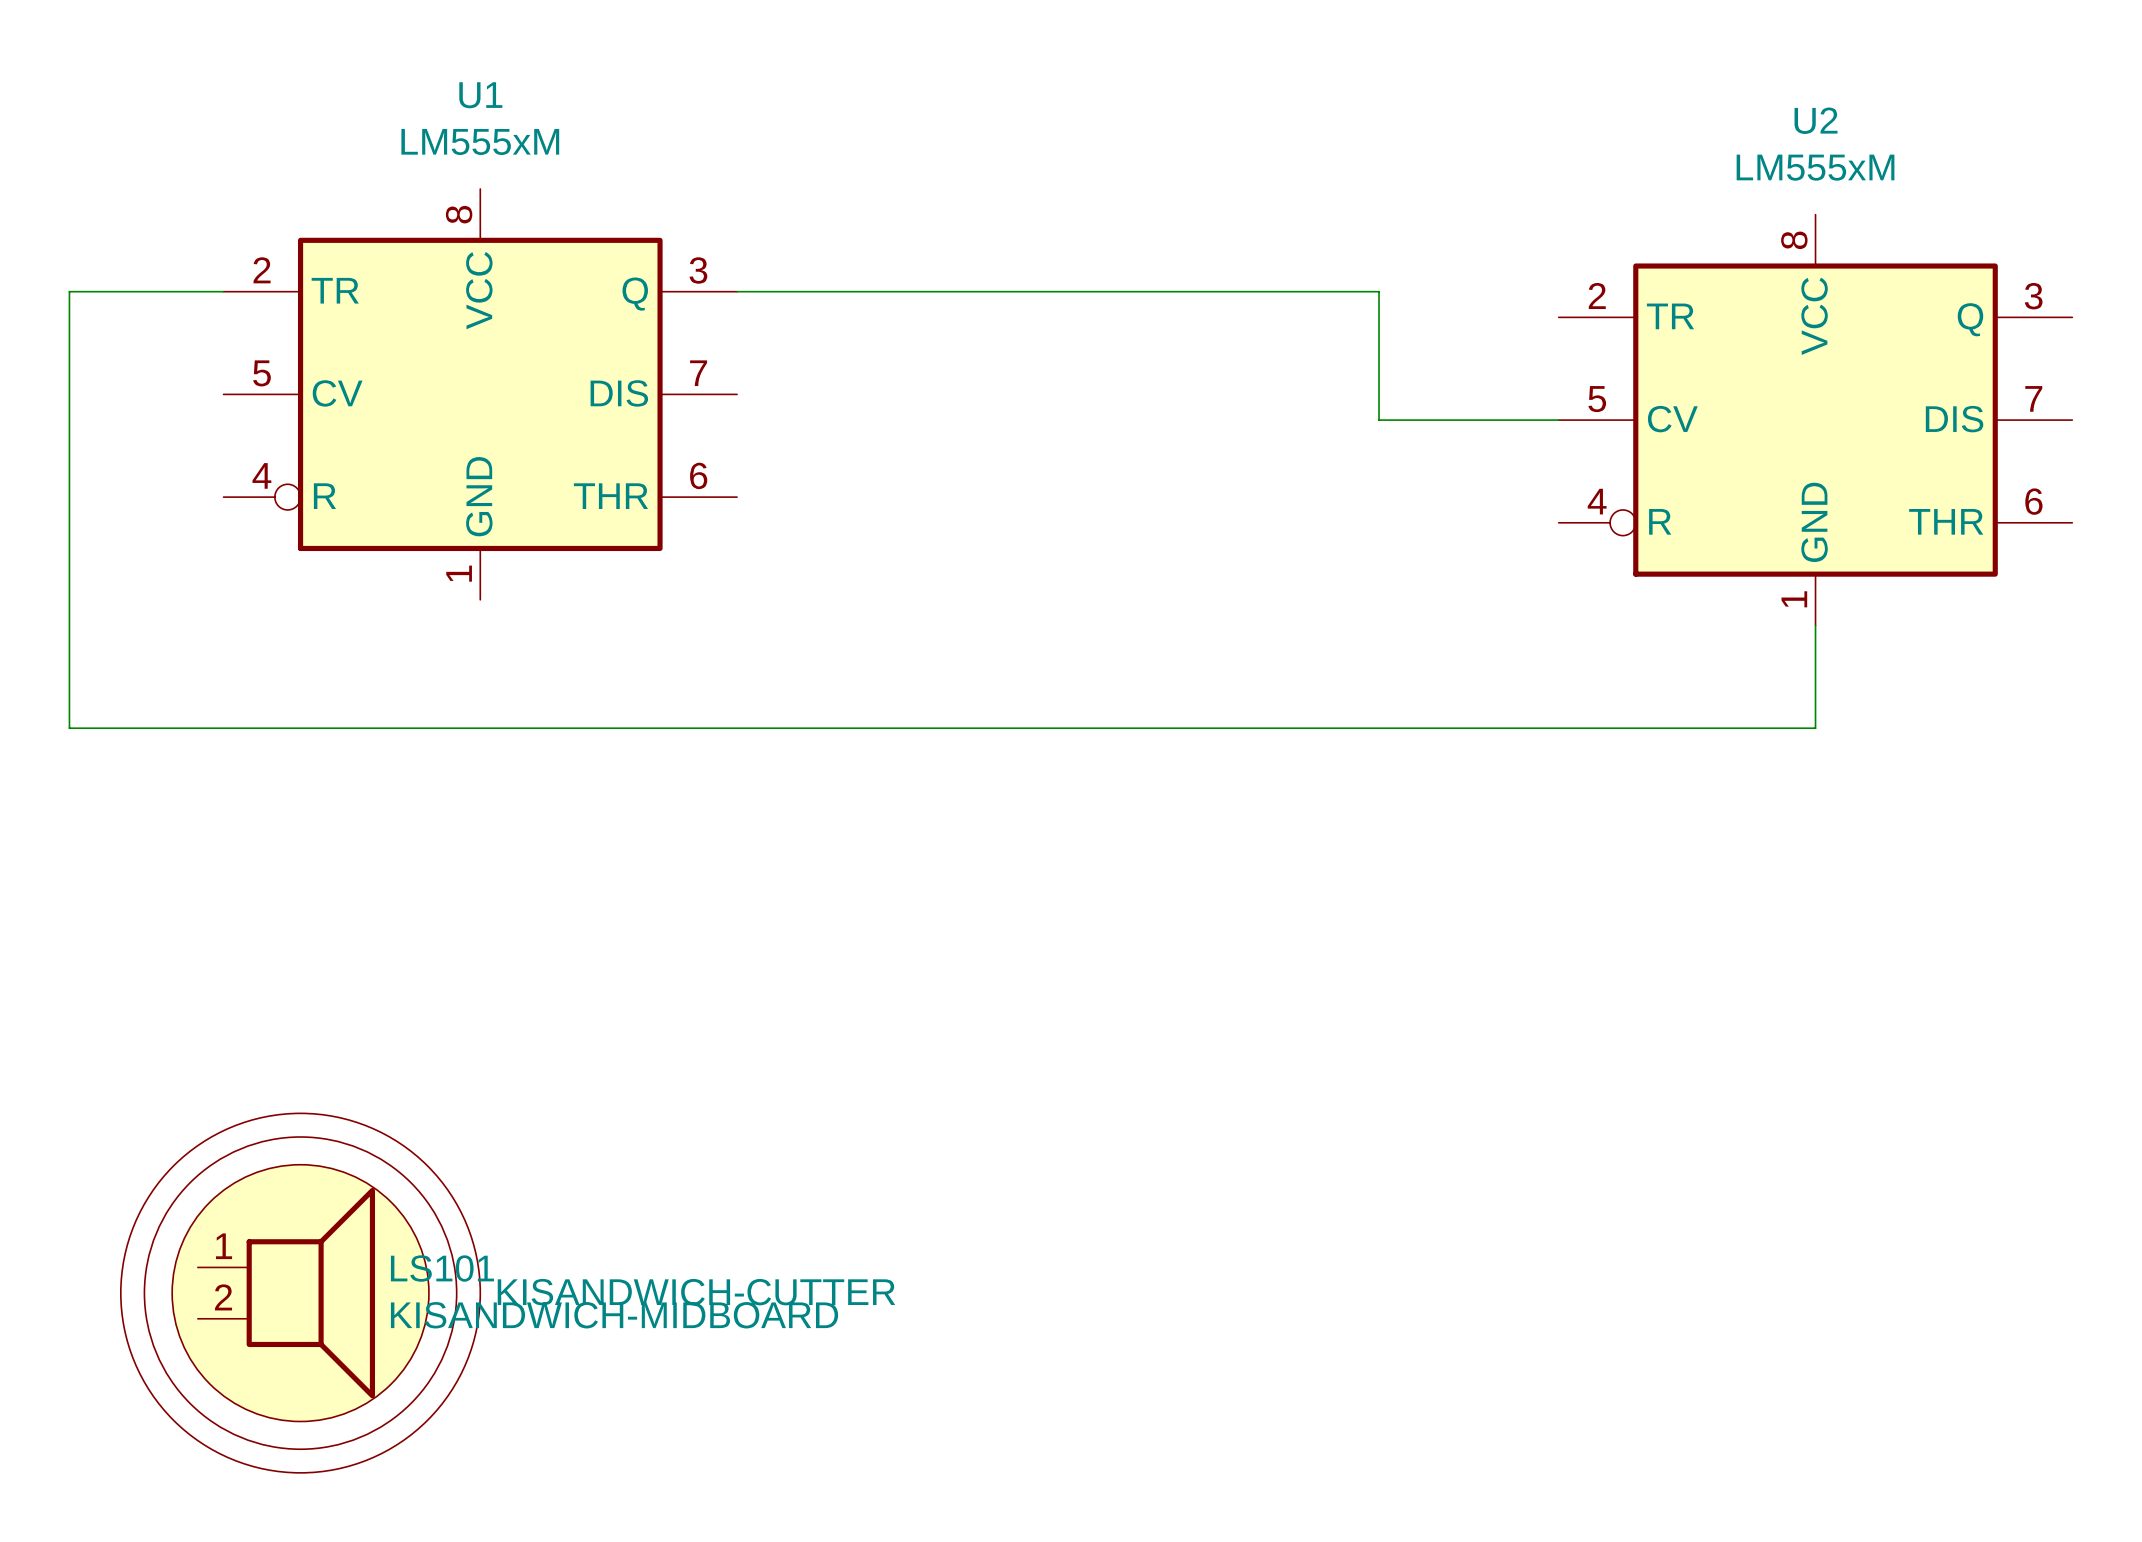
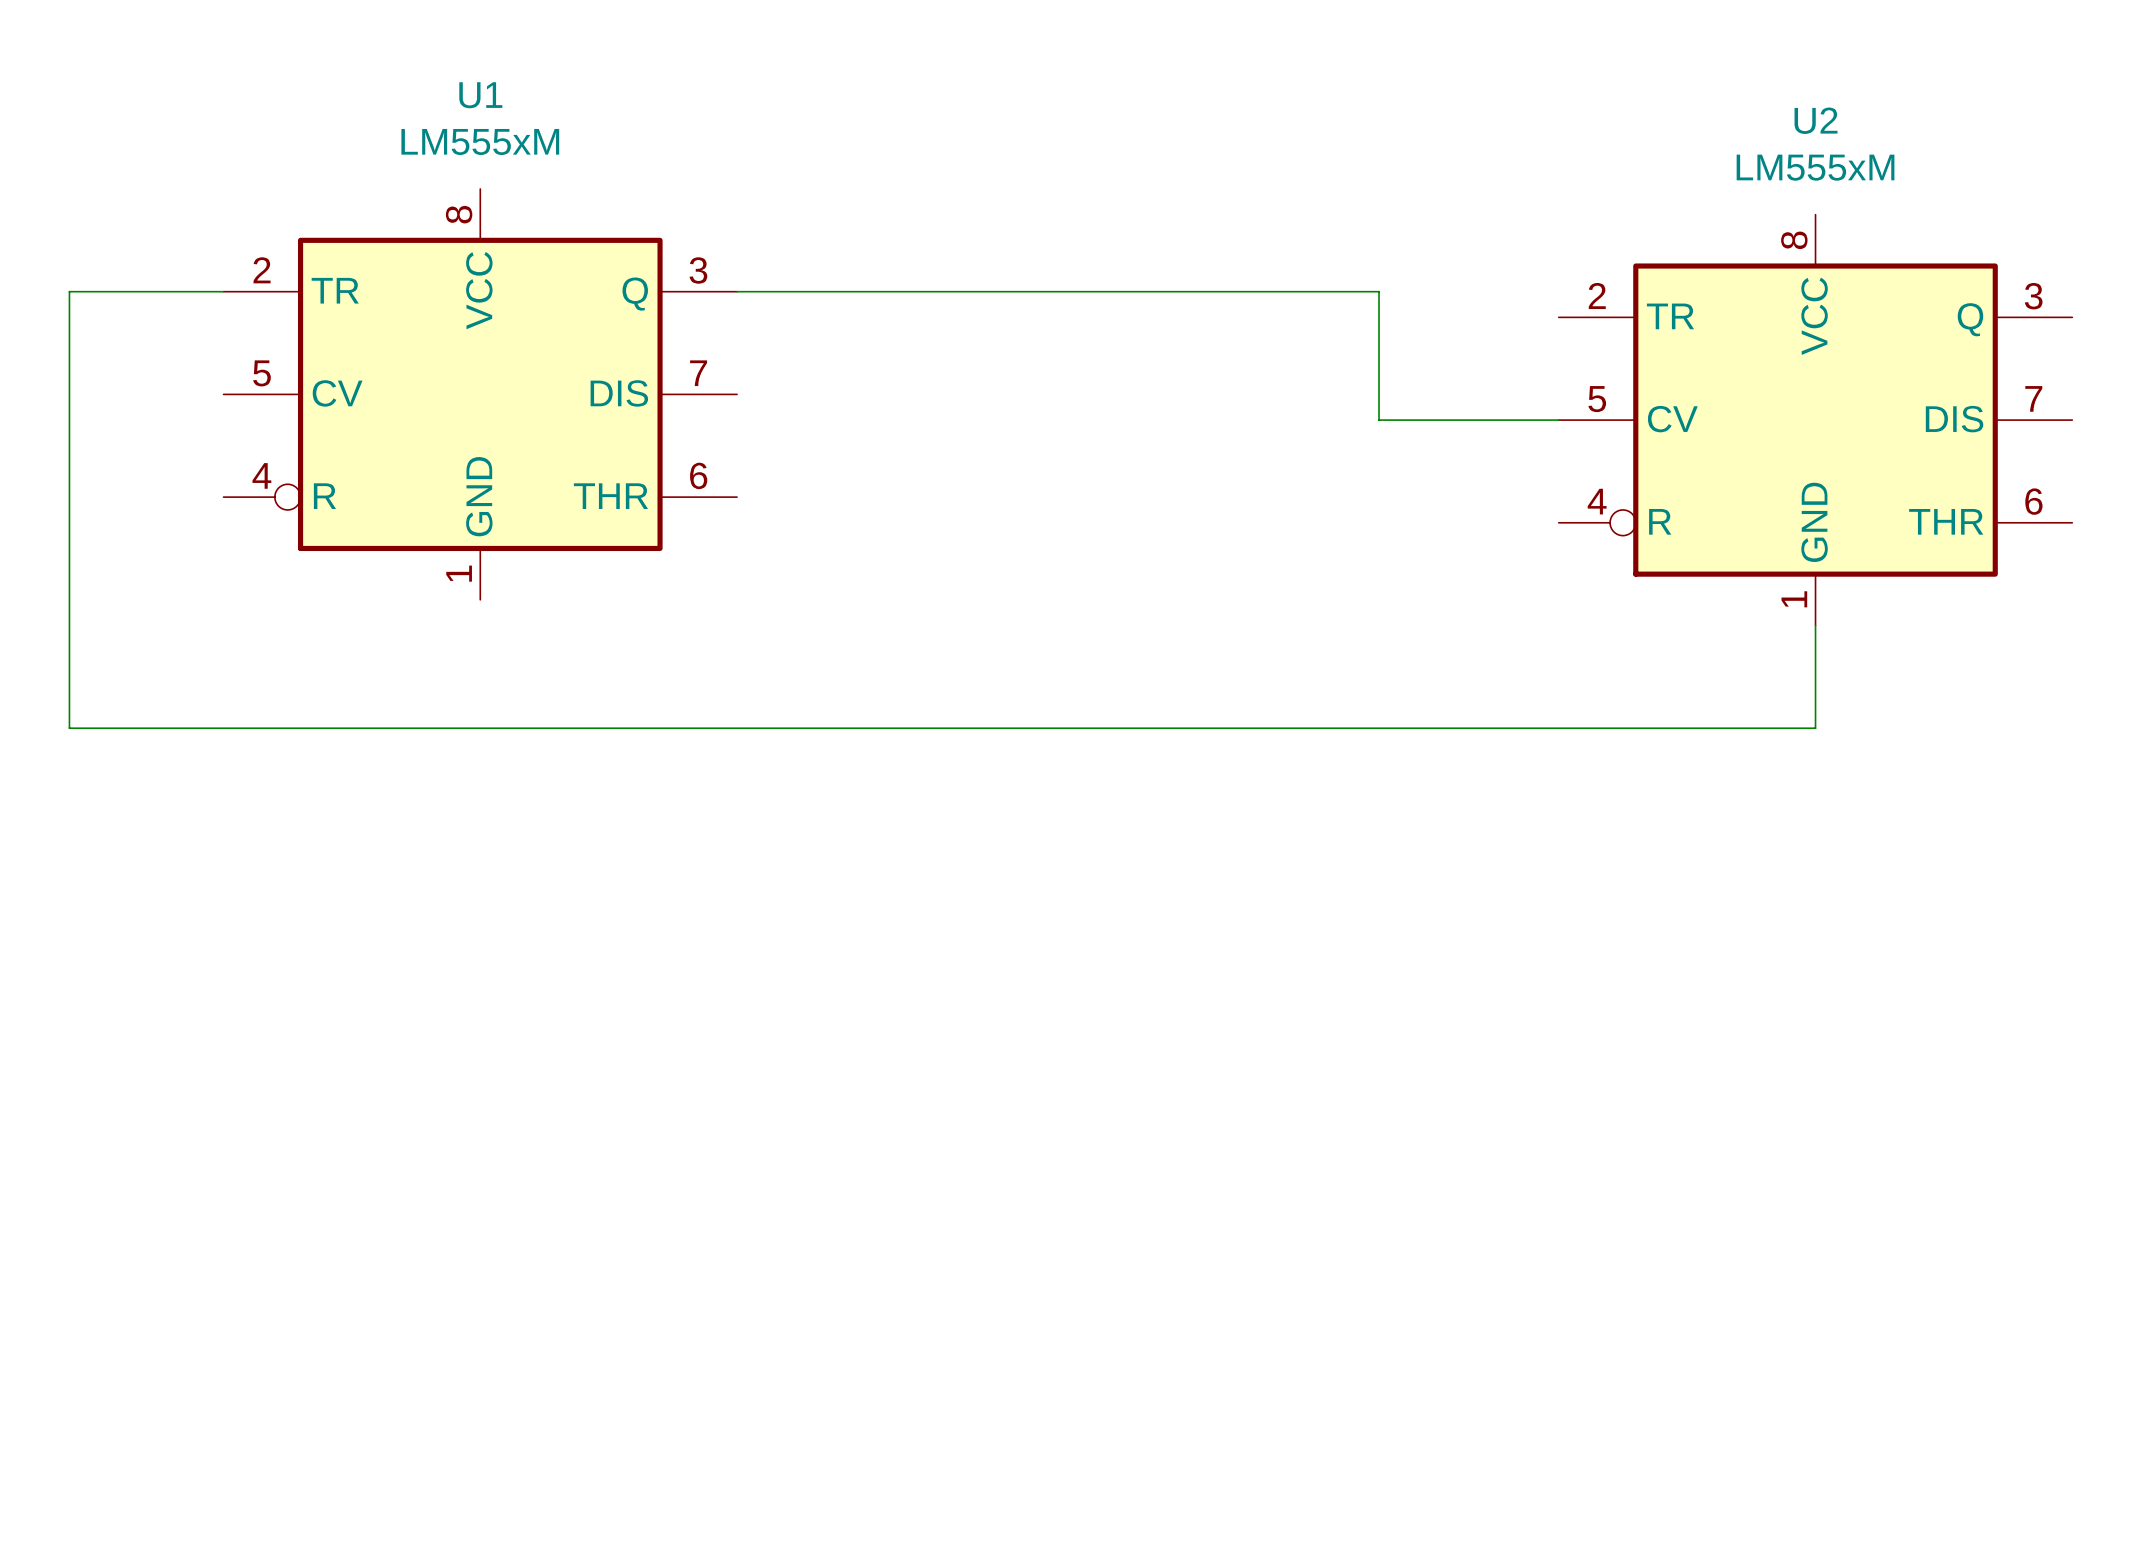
LS101: KISANDWICH-MIDBOARD (286, 1293) -> none
part: KISANDWICH-CUTTER (300, 1293) -> none

